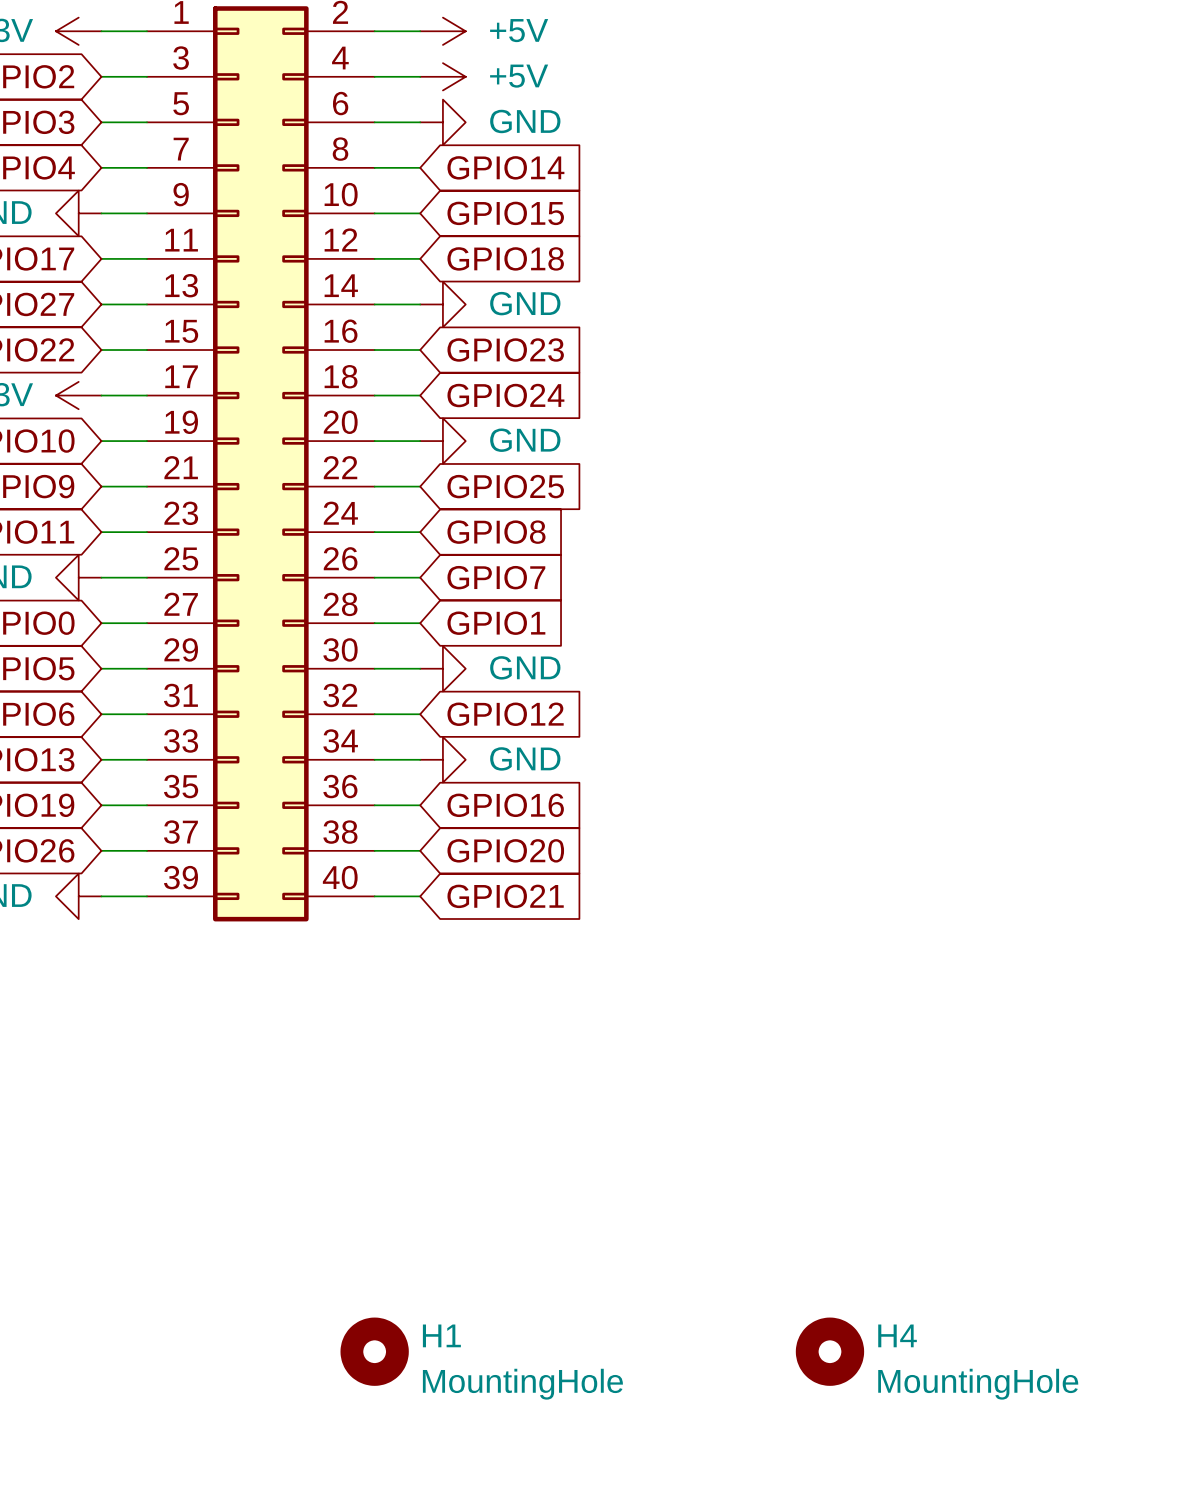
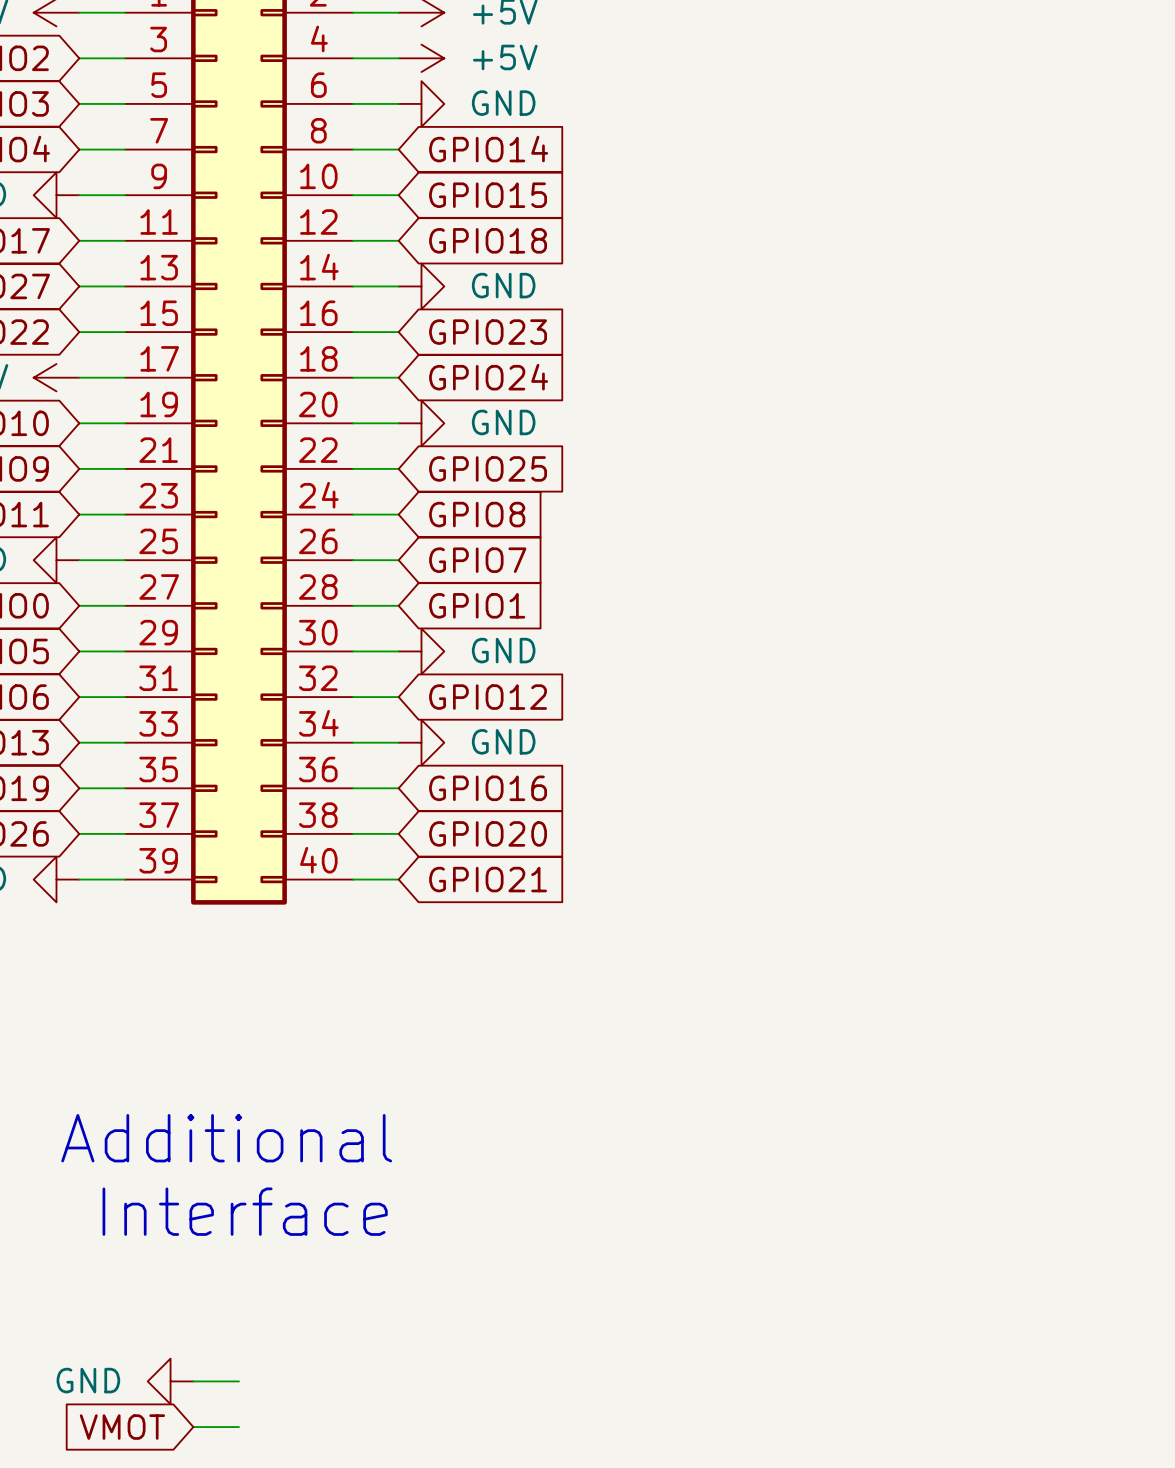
text: none -> Additional (226, 1138)
text: none -> Interface (245, 1211)
H1: MountingHole (374, 1351) -> none
H4: MountingHole (829, 1351) -> none
power symbol: none -> GND (170, 1381)
wire: none -> (193, 1381) (238, 1381)
global label: none -> VMOT (122, 1427)
wire: none -> (193, 1427) (238, 1427)

